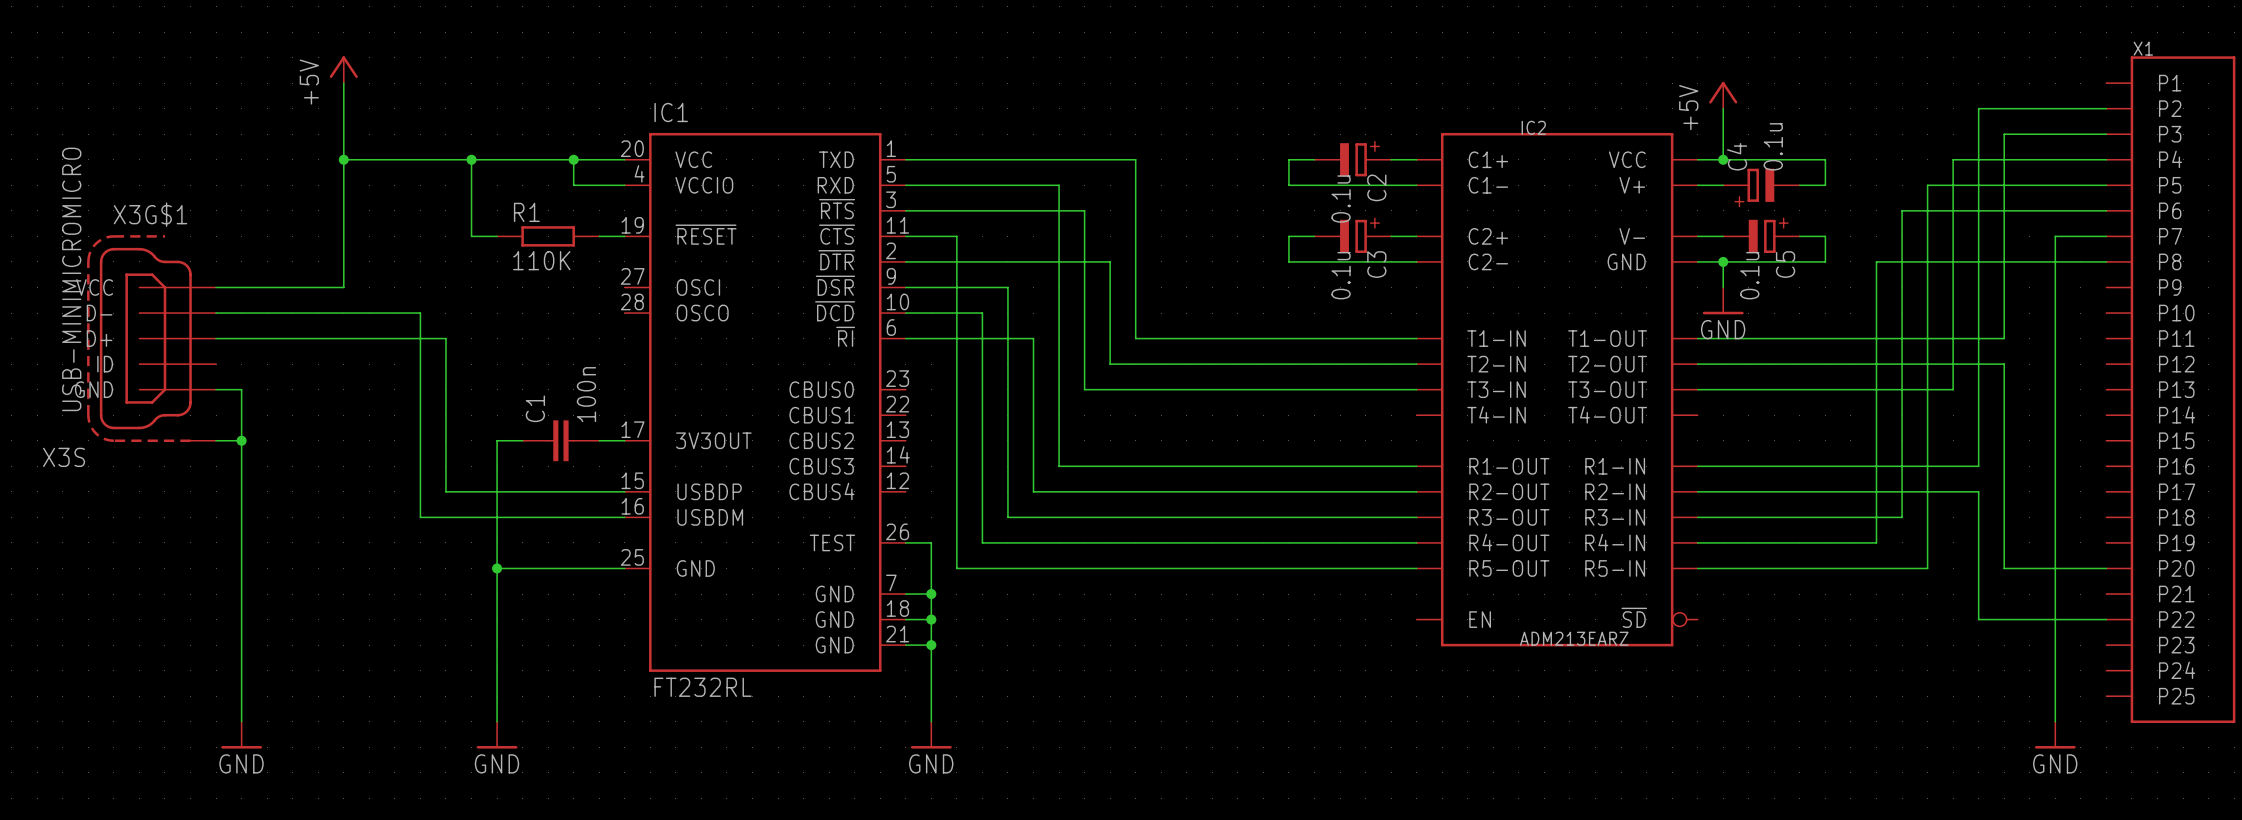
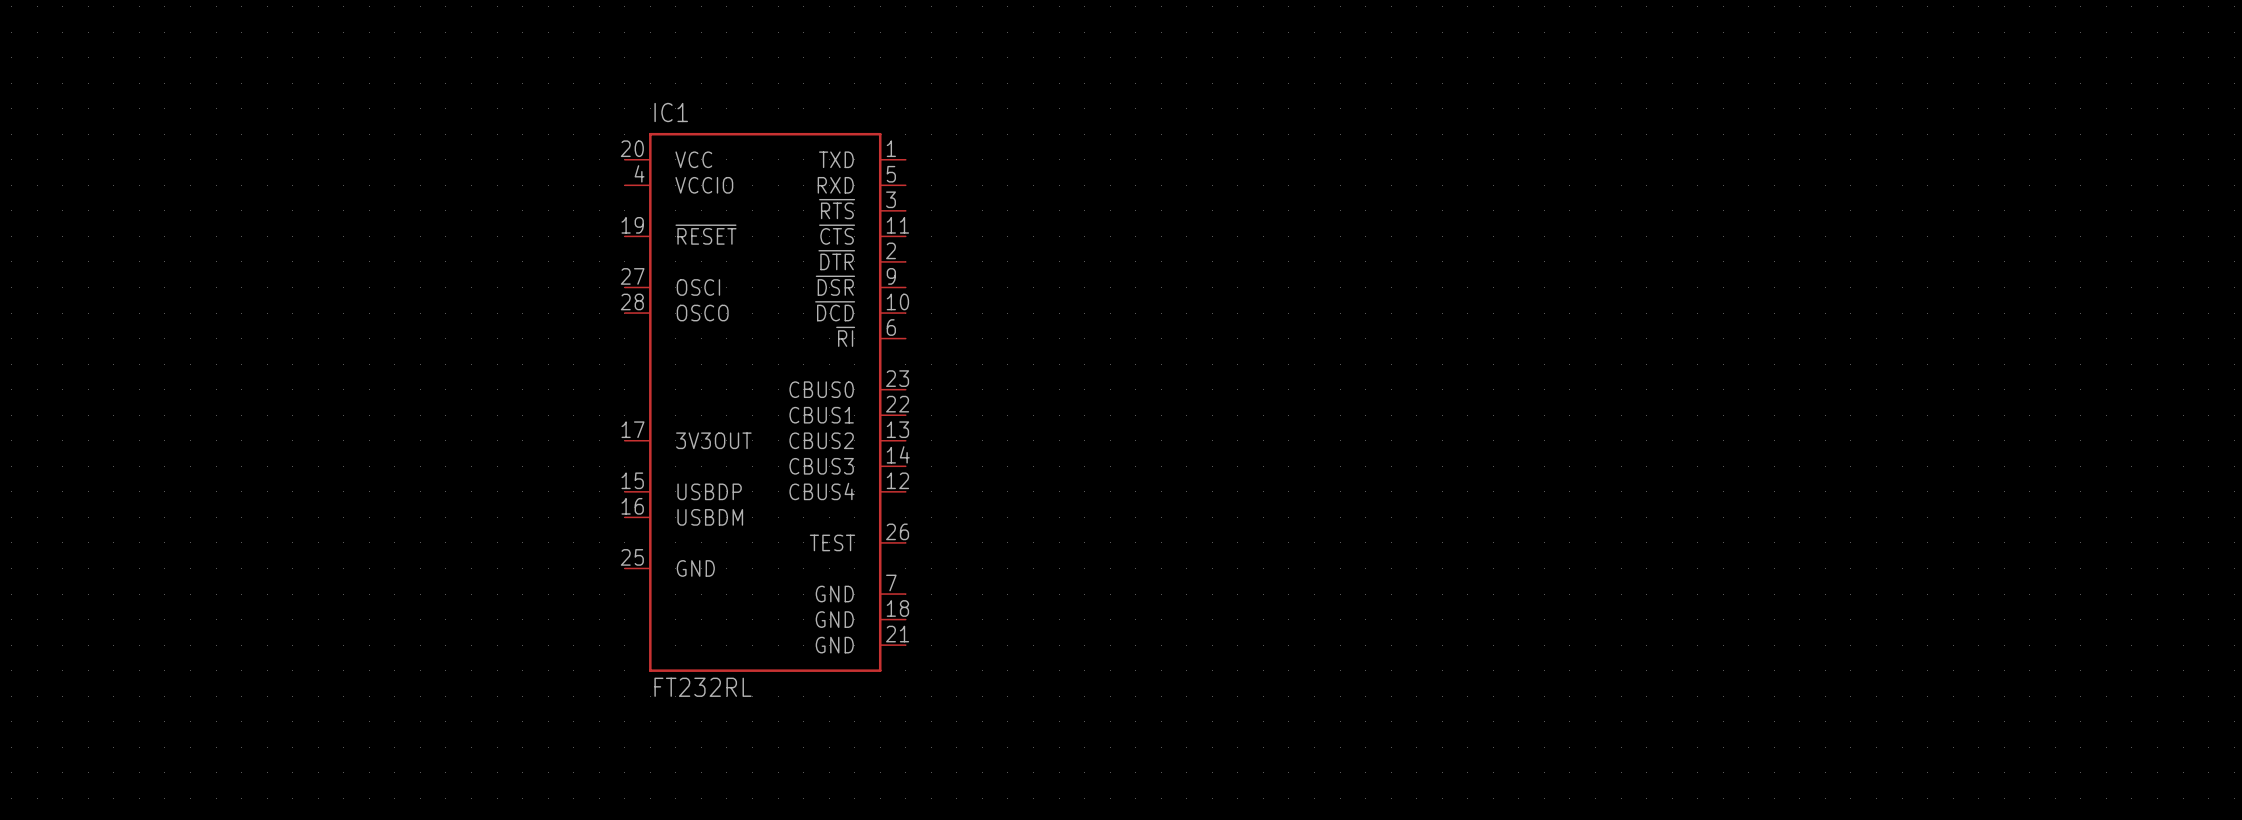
power symbol: +5V (343, 69) -> none
wire: (343, 83) (343, 287) (216, 287) -> none
power symbol: +5V (1723, 95) -> none
wire: (1723, 108) (1723, 159) -> none
wire: (2106, 108) (1978, 108) (1978, 466) (1697, 466) -> none
wire: (2106, 134) (2004, 134) (2004, 338) (1697, 338) -> none
wire: (343, 159) (624, 159) -> none
junction: (343, 159) -> none
wire: (471, 159) (471, 236) (497, 236) -> none
junction: (471, 159) -> none
wire: (573, 159) (573, 185) (624, 185) -> none
junction: (573, 159) -> none
wire: (905, 159) (1135, 159) (1135, 338) (1416, 338) -> none
wire: (1314, 159) (1288, 159) (1288, 185) (1416, 185) -> none
C2: 0.1u (1352, 159) -> none
wire: (1391, 159) (1416, 159) -> none
wire: (1697, 159) (1825, 159) (1825, 185) (1799, 185) -> none
junction: (1723, 159) -> none
wire: (2106, 159) (1953, 159) (1953, 389) (1697, 389) -> none
wire: (905, 185) (1059, 185) (1059, 466) (1416, 466) -> none
wire: (1697, 185) (1723, 185) -> none
C4: 0.1u (1761, 185) -> none
wire: (2106, 185) (1927, 185) (1927, 568) (1697, 568) -> none
wire: (905, 210) (1084, 210) (1084, 389) (1416, 389) -> none
wire: (2106, 210) (1902, 210) (1902, 517) (1697, 517) -> none
R1: 110K (548, 236) -> none
wire: (599, 236) (624, 236) -> none
wire: (905, 236) (956, 236) (956, 568) (1416, 568) -> none
wire: (1314, 236) (1288, 236) (1288, 261) (1416, 261) -> none
C3: 0.1u (1352, 236) -> none
wire: (1391, 236) (1416, 236) -> none
wire: (1697, 236) (1723, 236) -> none
C5: 0.1u (1761, 236) -> none
wire: (1799, 236) (1825, 236) (1825, 261) (1697, 261) -> none
wire: (2106, 236) (2055, 236) (2055, 721) -> none
wire: (905, 261) (1110, 261) (1110, 364) (1416, 364) -> none
wire: (1723, 261) (1723, 287) -> none
junction: (1723, 261) -> none
wire: (2106, 261) (1876, 261) (1876, 542) (1697, 542) -> none
wire: (905, 287) (1007, 287) (1007, 517) (1416, 517) -> none
power symbol: GND (1723, 300) -> none
wire: (216, 313) (420, 313) (420, 517) (624, 517) -> none
wire: (905, 313) (982, 313) (982, 542) (1416, 542) -> none
X3S: (151, 338) -> none
X3G$1: USB-MINIMICROMICRO (157, 338) -> none
wire: (216, 338) (445, 338) (445, 491) (624, 491) -> none
wire: (905, 338) (1033, 338) (1033, 491) (1416, 491) -> none
wire: (1697, 364) (2004, 364) (2004, 568) (2106, 568) -> none
wire: (216, 389) (241, 389) (241, 721) -> none
IC2: ADM213EARZ (1557, 389) -> none
X1: (2170, 389) -> none
wire: (216, 440) (241, 440) -> none
junction: (241, 440) -> none
wire: (522, 440) (497, 440) (497, 721) -> none
C1: 100n (560, 440) -> none
wire: (599, 440) (624, 440) -> none
wire: (1697, 491) (1978, 491) (1978, 619) (2106, 619) -> none
wire: (905, 542) (931, 542) (931, 721) -> none
wire: (497, 568) (624, 568) -> none
junction: (497, 568) -> none
wire: (905, 594) (931, 594) -> none
junction: (931, 594) -> none
wire: (905, 619) (931, 619) -> none
junction: (931, 619) -> none
wire: (905, 645) (931, 645) -> none
junction: (931, 645) -> none
power symbol: GND (241, 735) -> none
power symbol: GND (497, 735) -> none
power symbol: GND (931, 735) -> none
power symbol: GND (2055, 735) -> none

